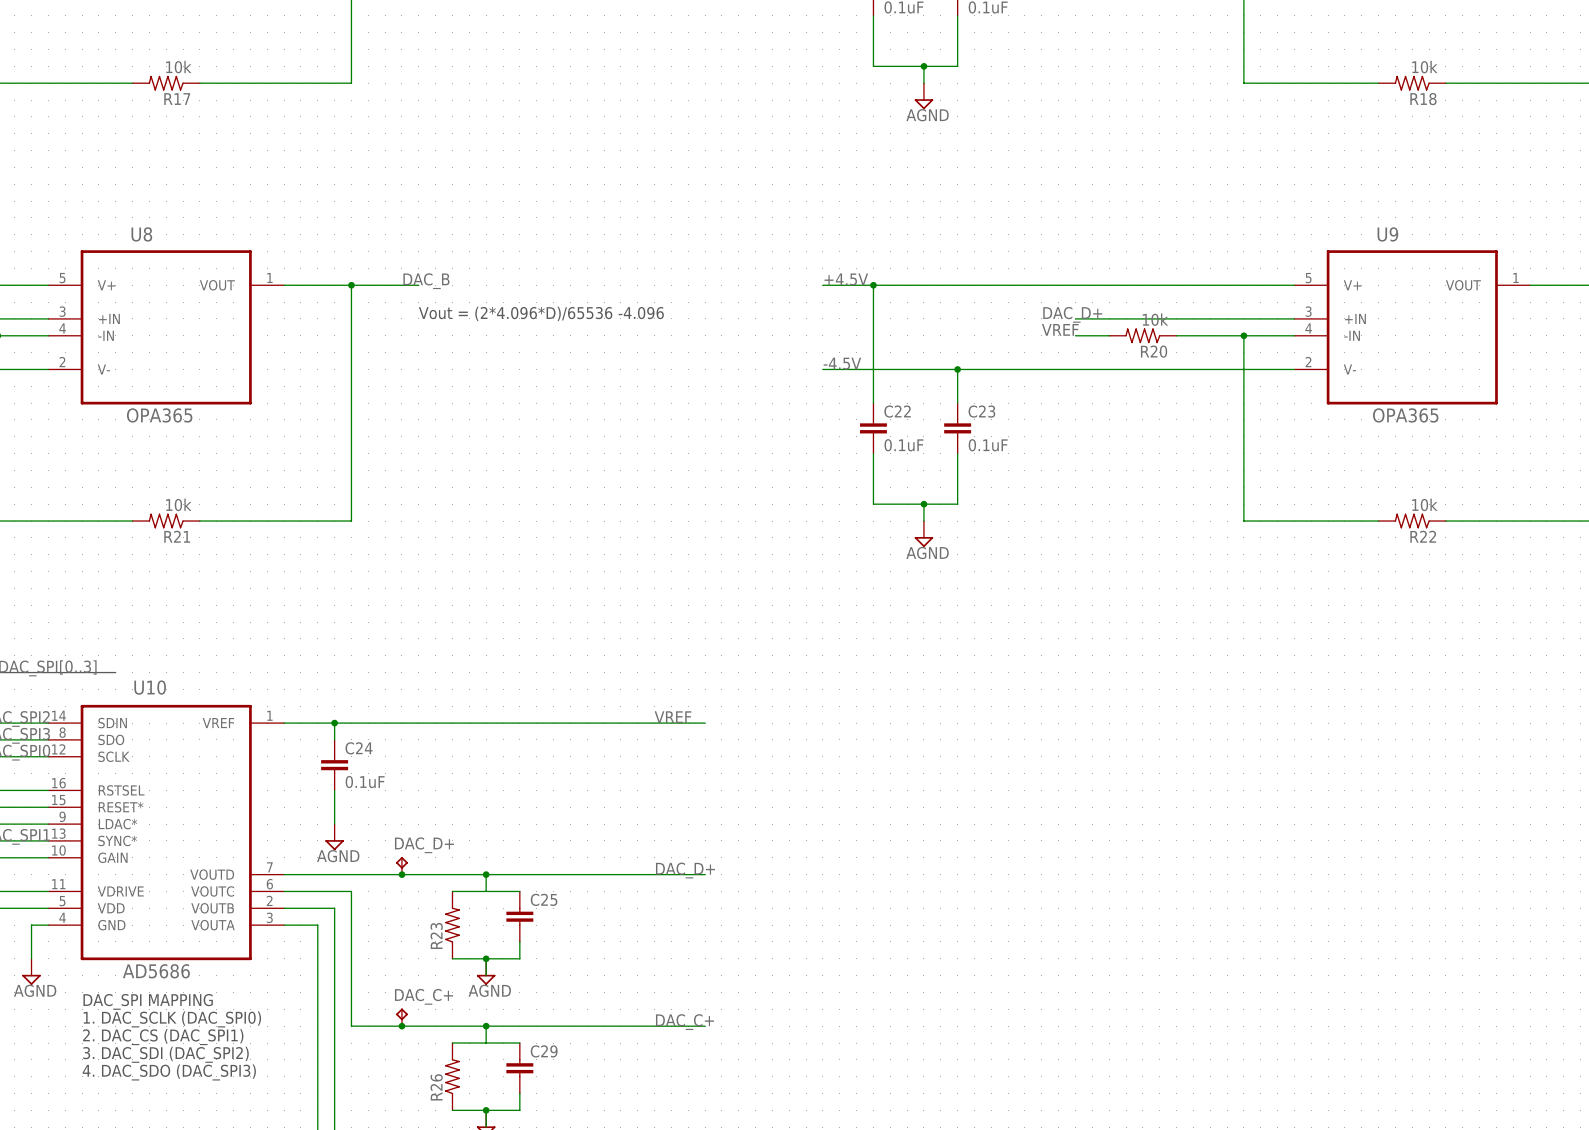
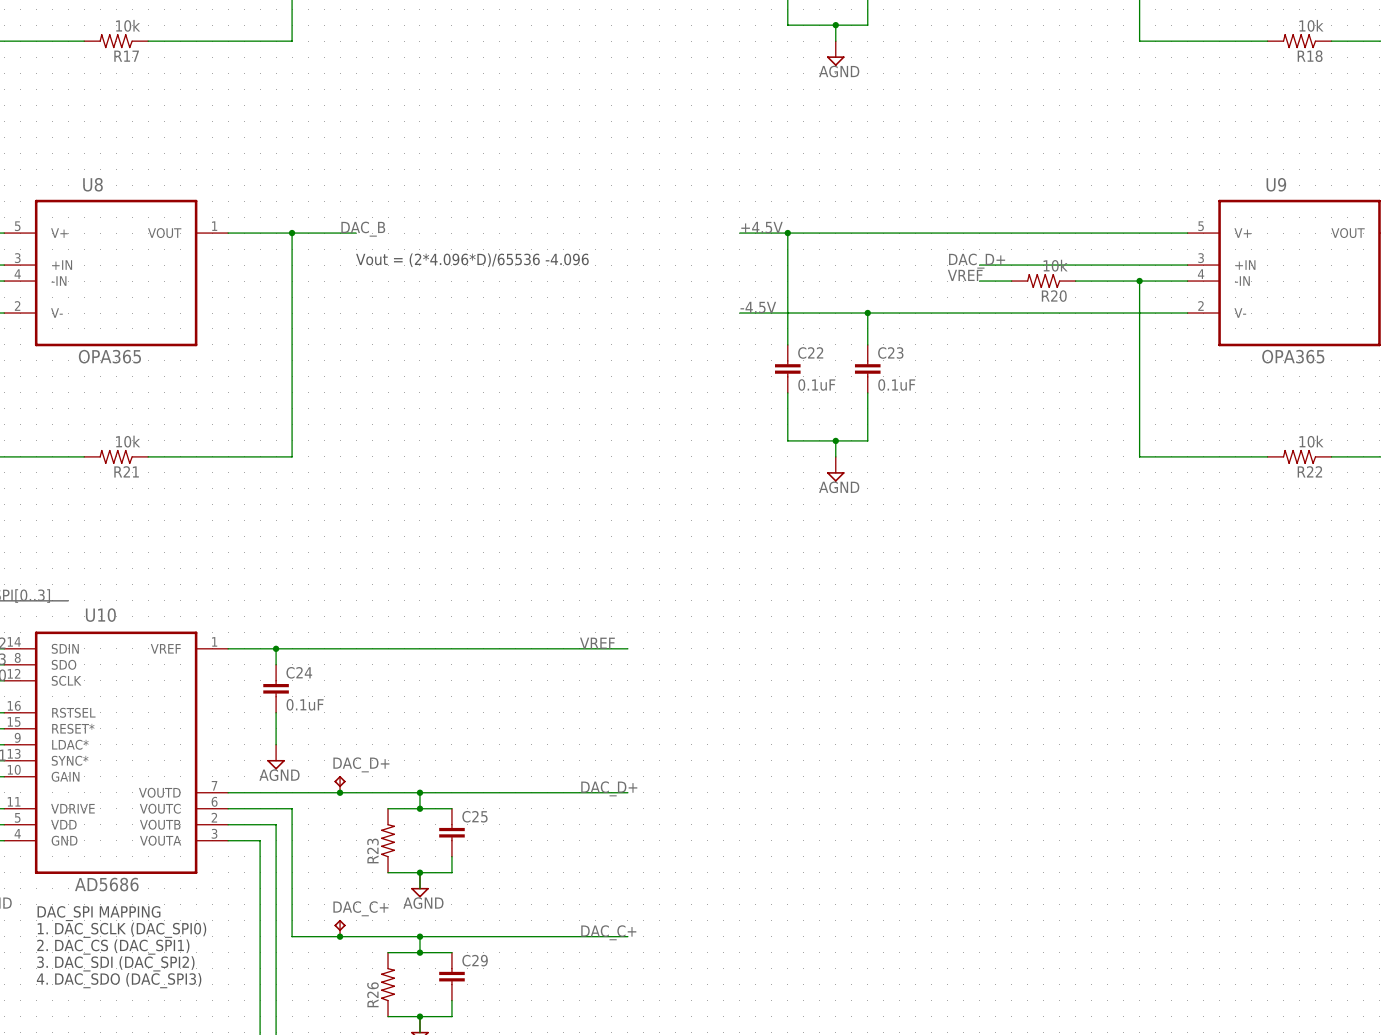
junction: none -> (419, 808)
junction: none -> (419, 952)

